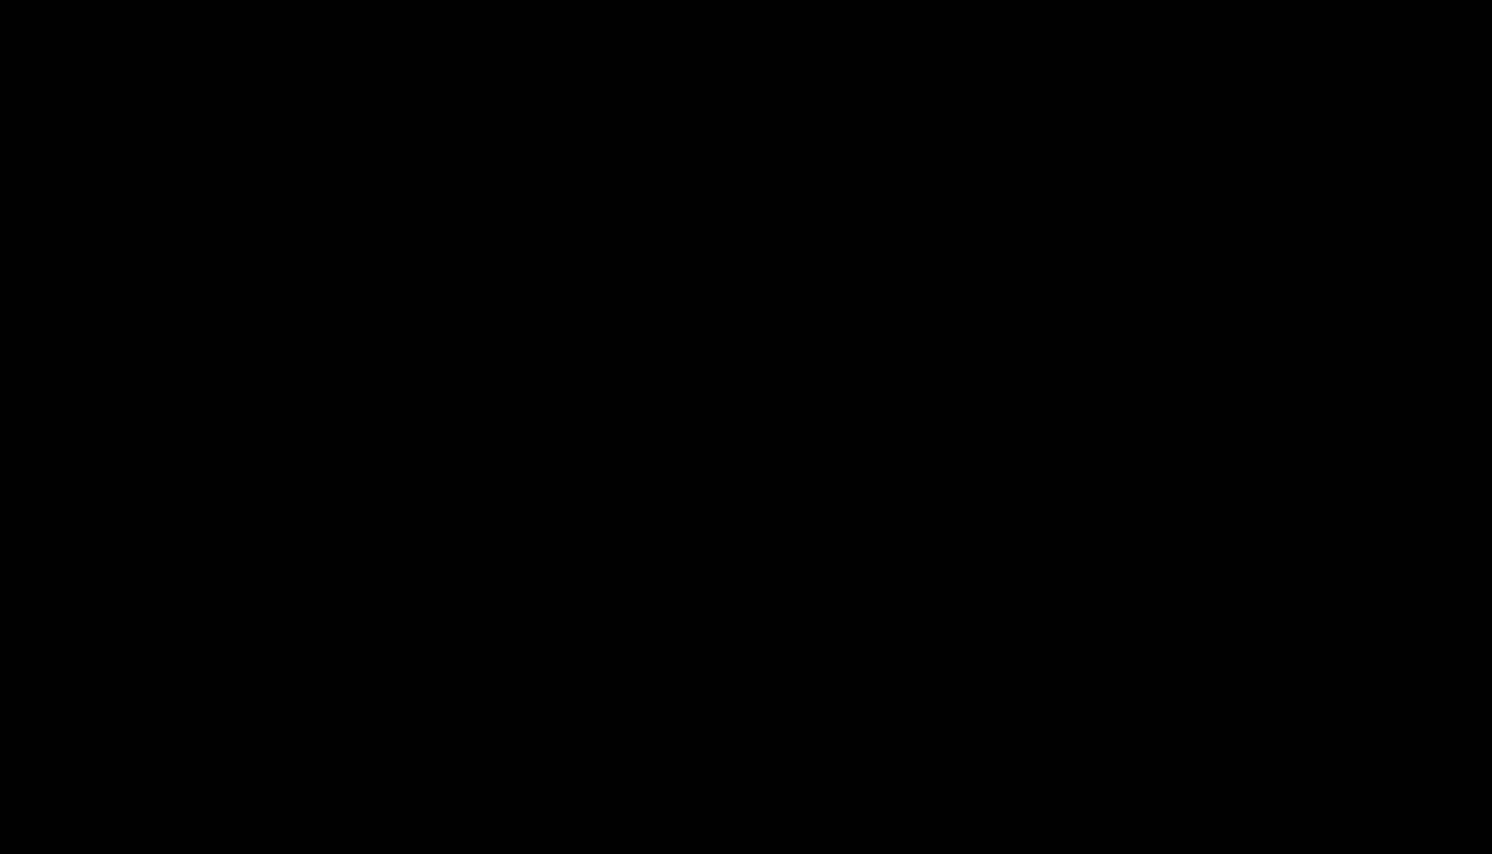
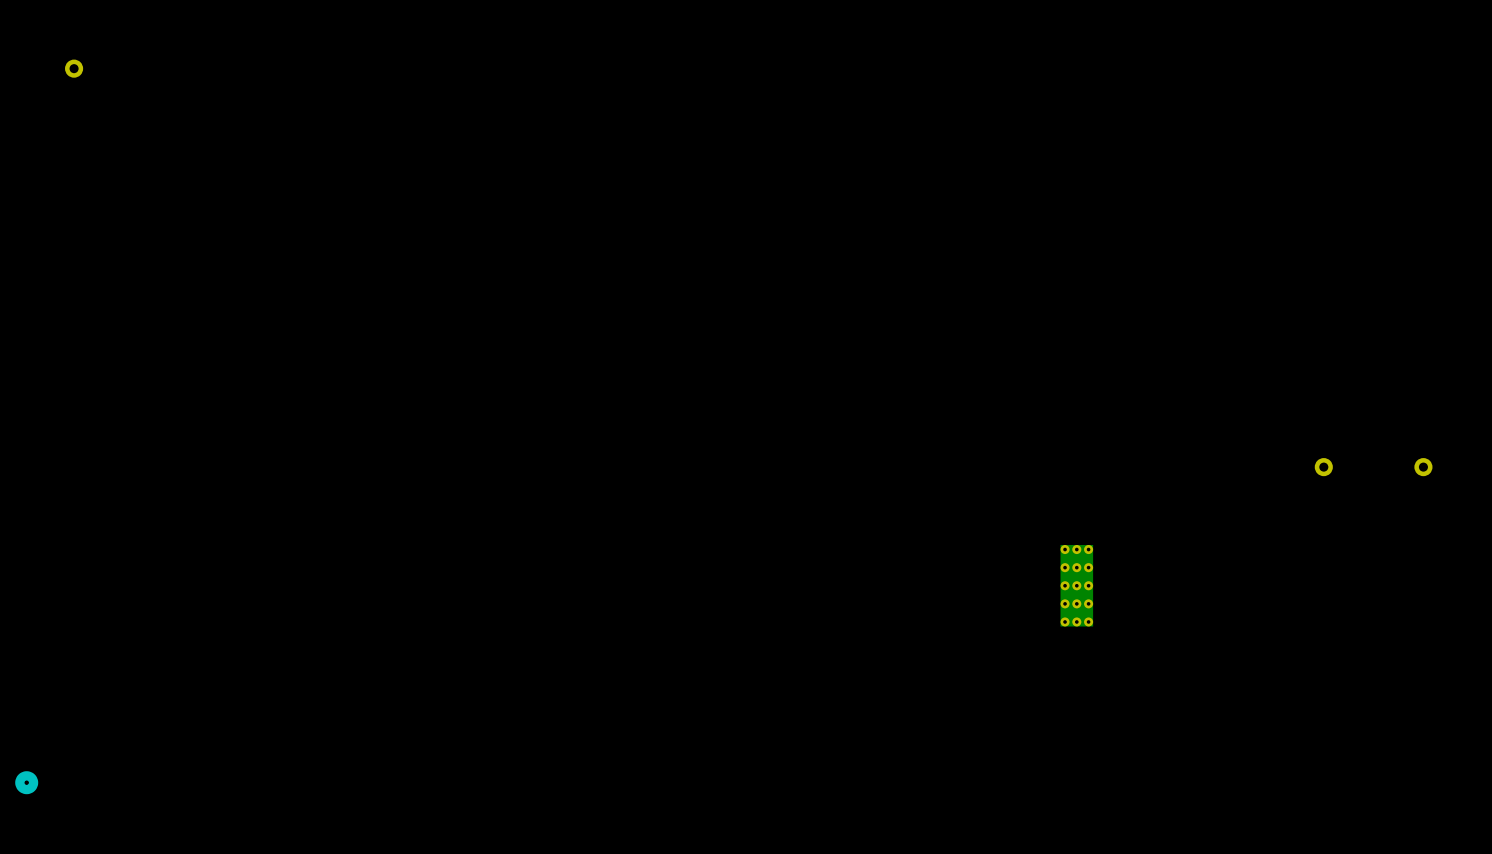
part: none -> (74, 68)
part: none -> (1323, 467)
part: none -> (1423, 467)
part: none -> (1076, 585)
part: none -> (26, 782)

